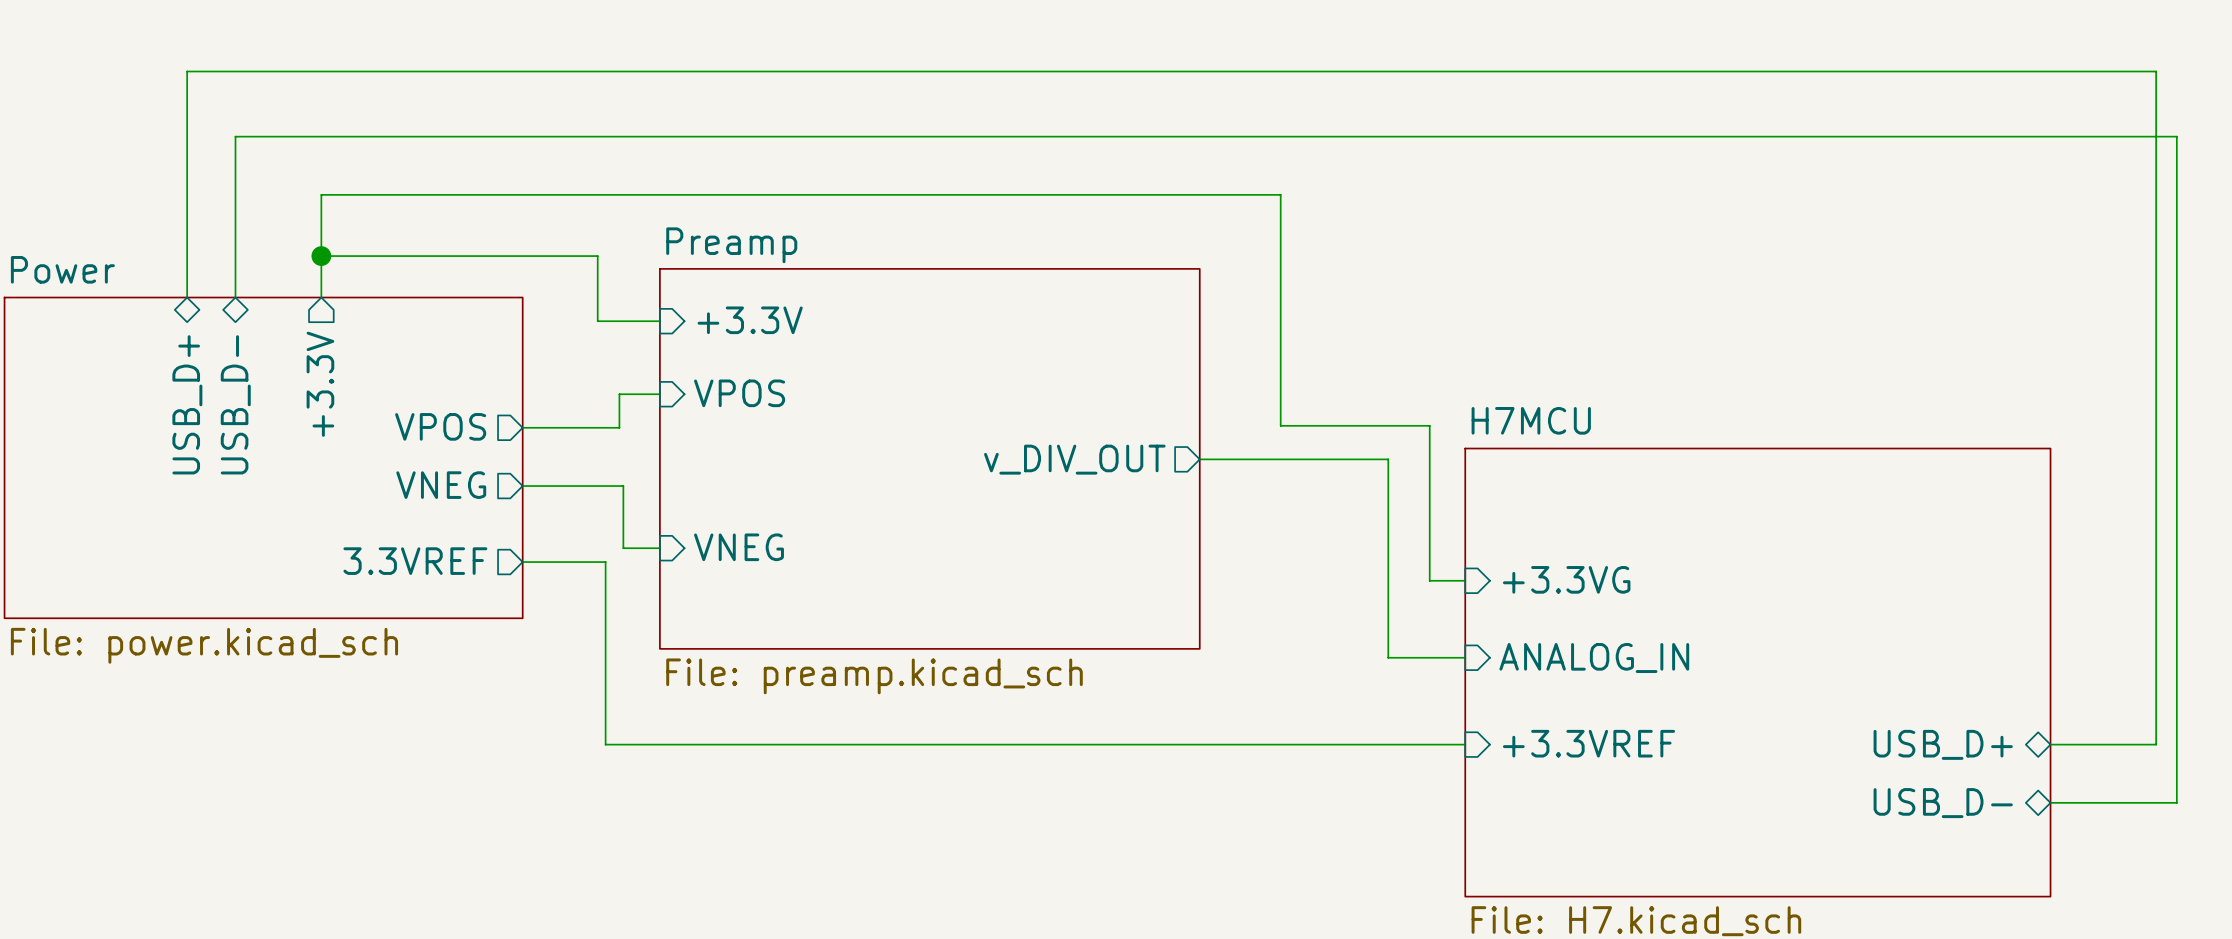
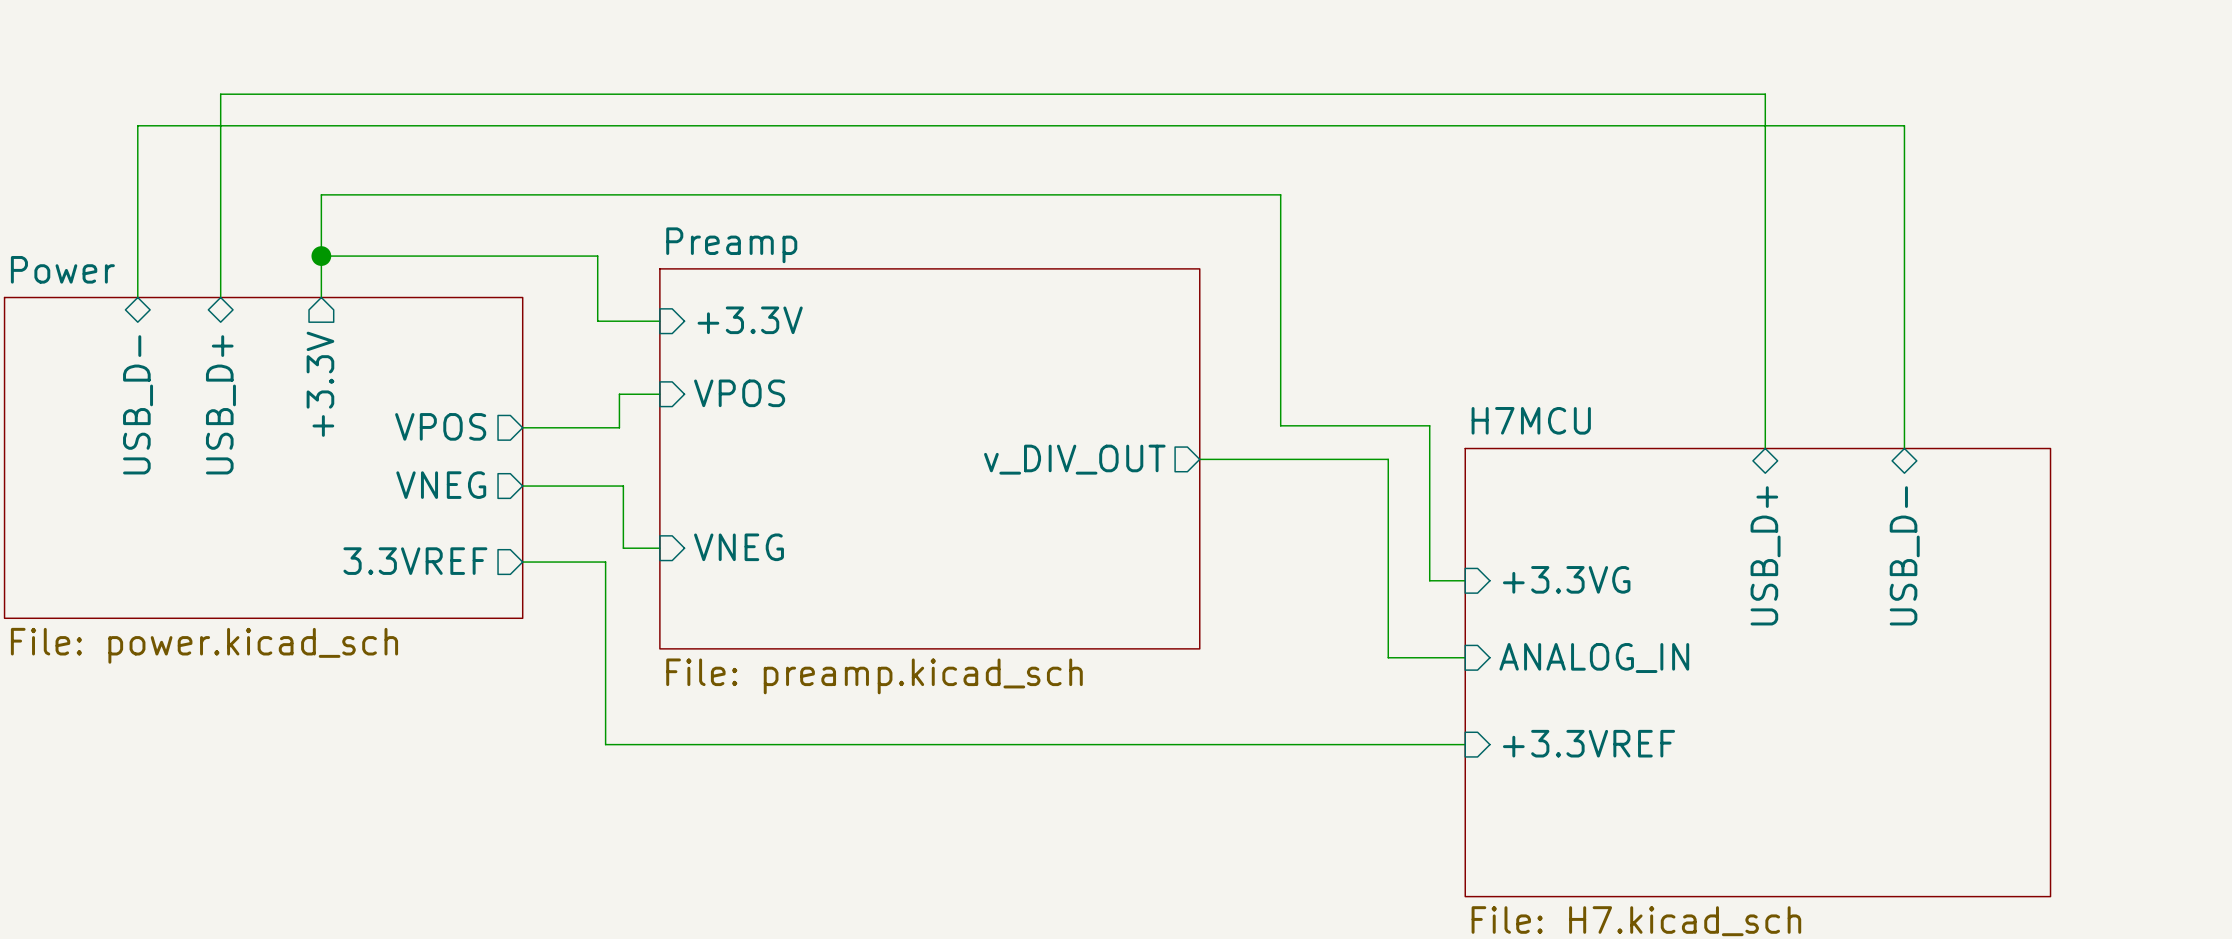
wire: none -> (137, 297) (137, 125) (1904, 125) (1904, 448)
wire: (187, 297) (187, 71) (2156, 71) (2156, 744) (2050, 744) -> none
wire: none -> (220, 297) (220, 94) (1765, 94) (1765, 448)
wire: (235, 297) (235, 136) (2176, 136) (2176, 802) (2050, 802) -> none
sheet pin position: USB_D+ (187, 404) -> USB_D+ (220, 404)
sheet pin position: USB_D- (235, 404) -> USB_D- (138, 404)
sheet pin rotation: 0° (1943, 744) -> 90° counterclockwise (1765, 555)
sheet pin position: USB_D+ (1943, 744) -> USB_D+ (1765, 555)
sheet pin rotation: 0° (1943, 803) -> 90° counterclockwise (1904, 555)
sheet pin position: USB_D- (1943, 803) -> USB_D- (1904, 555)

